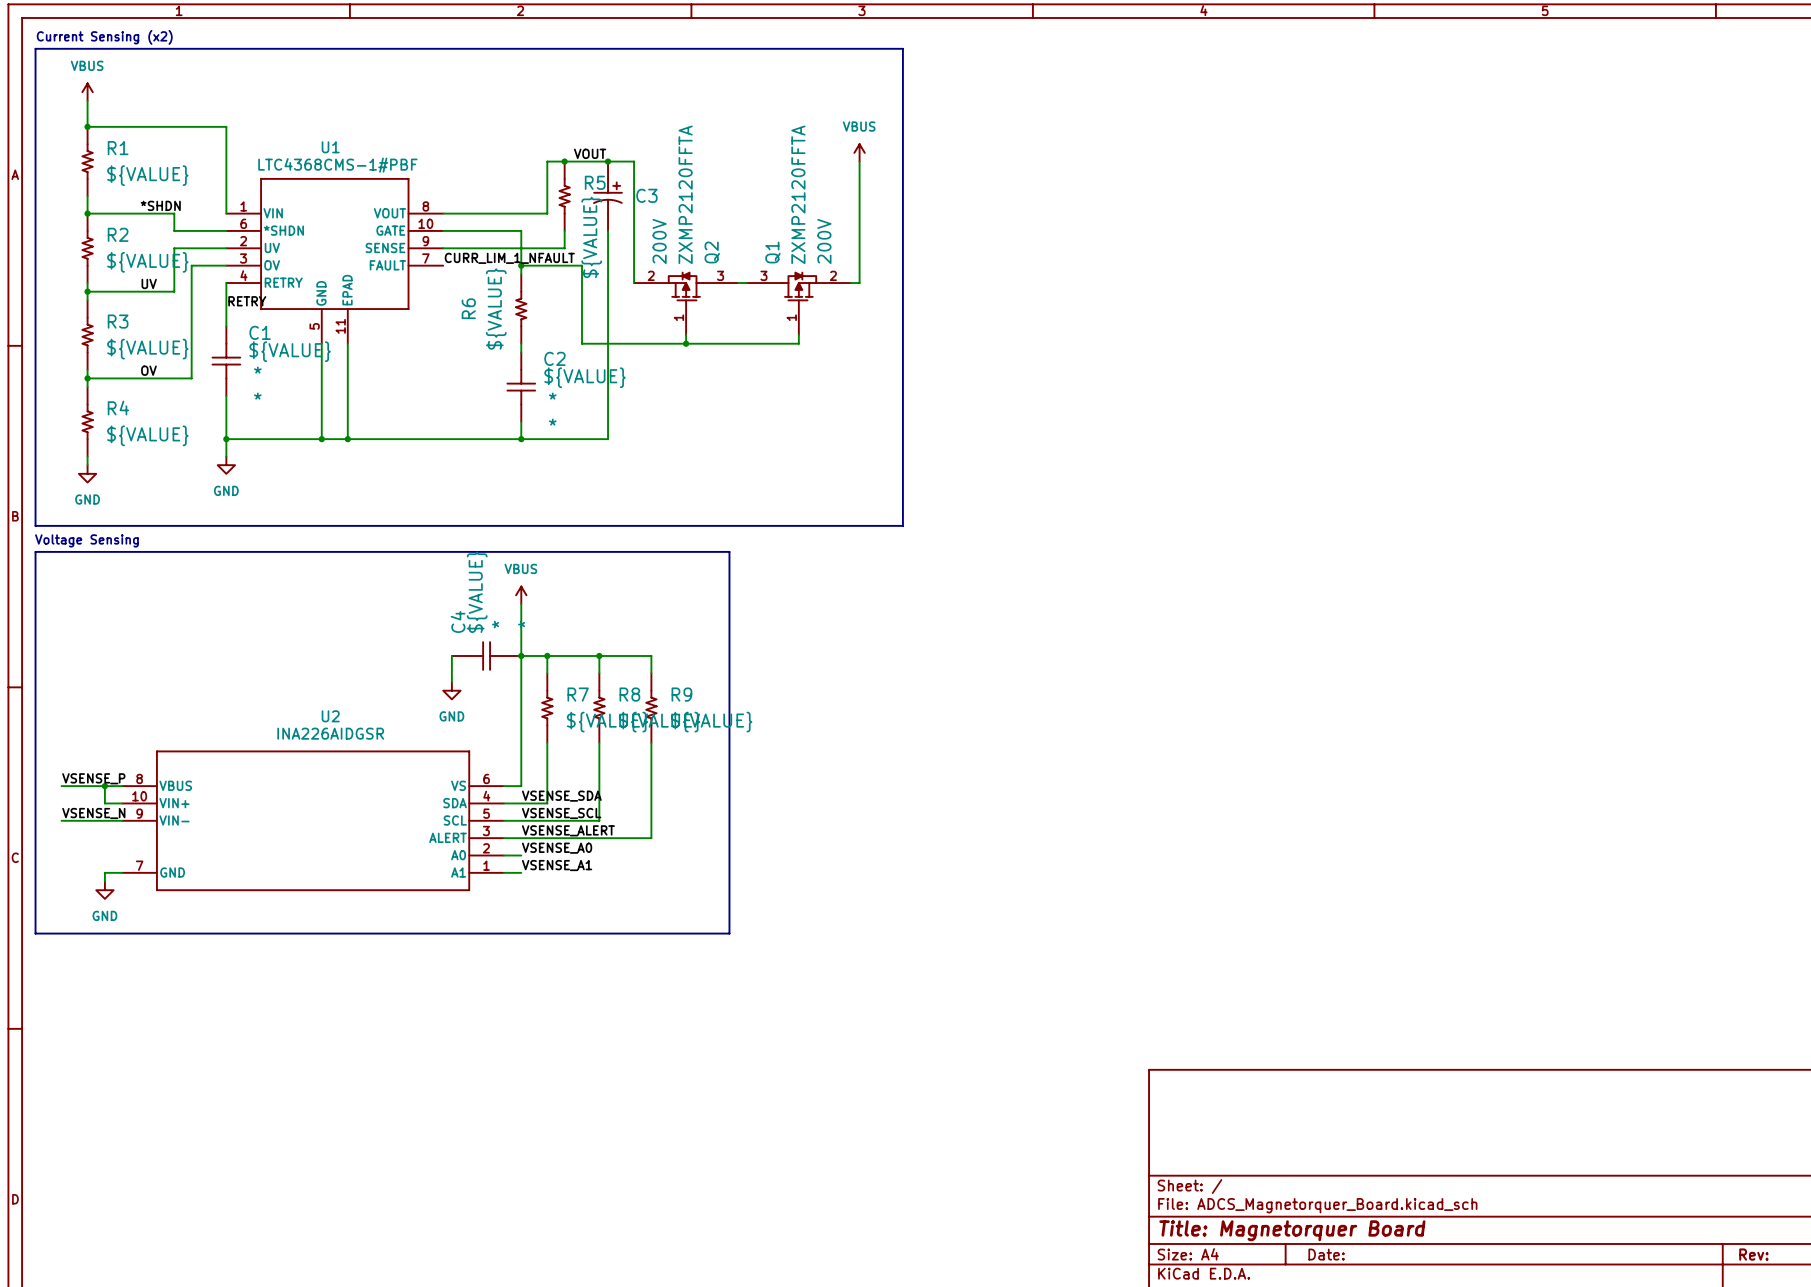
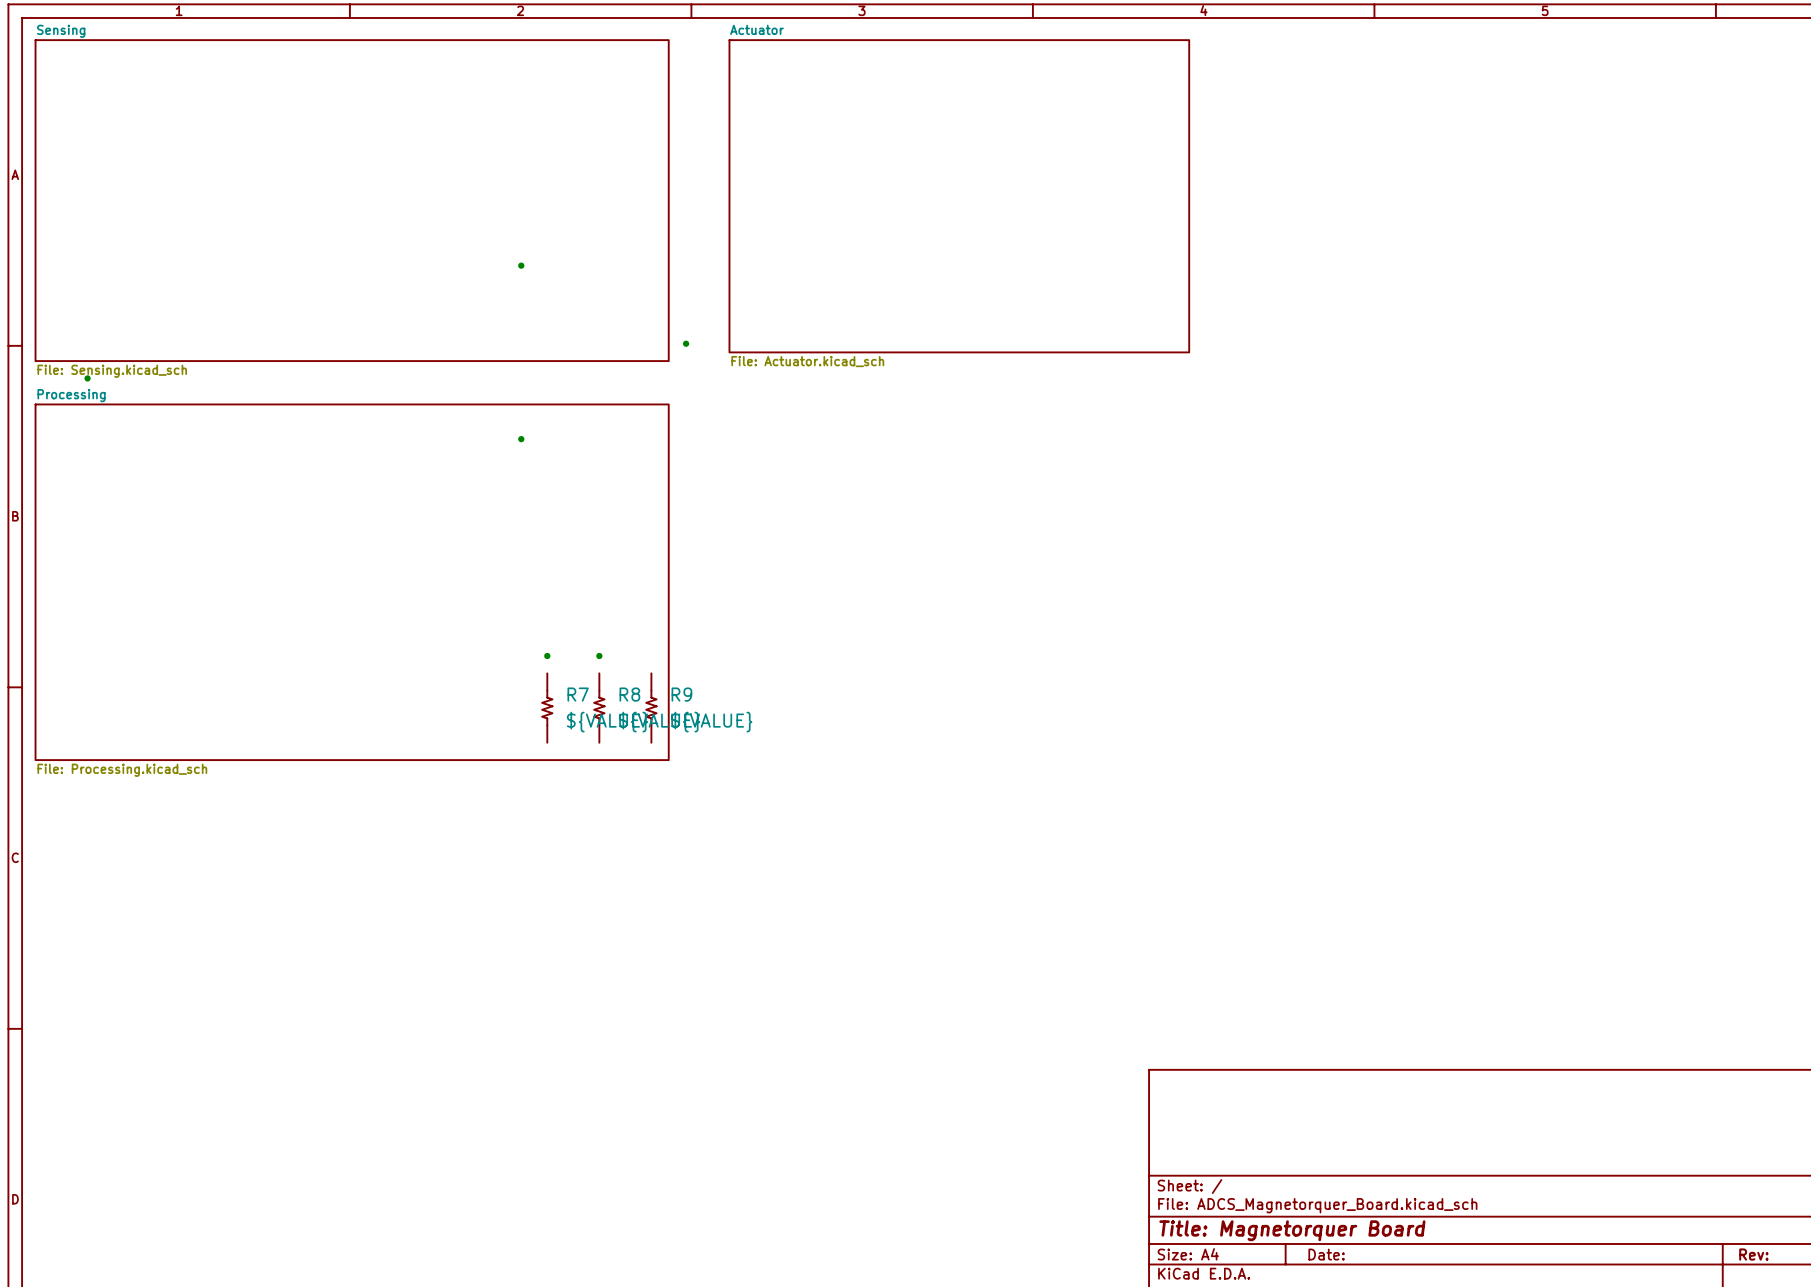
text: Current Sensing (x2) (104, 37) -> none
line: (35, 48) (902, 48) (902, 525) (35, 525) (35, 48) -> none
power symbol: VBUS (87, 92) -> none
wire: (87, 100) (87, 126) (226, 126) (226, 213) -> none
junction: (87, 126) -> none
power symbol: VBUS (859, 152) -> none
label: VOUT (590, 153) -> none
R1: ${VALUE} (87, 161) -> none
junction: (564, 161) -> none
junction: (608, 161) -> none
wire: (859, 161) (859, 283) (850, 283) -> none
wire: (87, 196) (87, 213) (174, 213) (174, 230) (226, 230) -> none
R5: ${VALUE} (564, 196) -> none
C3: (607, 196) -> none
sheet Actuator: none -> File: Actuator.kicad_sch (959, 196)
sheet Sensing: none -> File: Sensing.kicad_sch (352, 200)
label: *SHDN (160, 205) -> none
junction: (87, 213) -> none
wire: (443, 213) (547, 213) (547, 161) (634, 161) (634, 283) -> none
wire: (443, 230) (521, 230) (521, 274) -> none
wire: (564, 230) (564, 248) (443, 248) -> none
wire: (608, 230) (608, 439) (226, 439) -> none
R2: ${VALUE} (87, 248) -> none
wire: (226, 248) (174, 248) (174, 291) (87, 291) -> none
label: CURR_LIM_1_NFAULT (509, 258) -> none
U1: LTC4368CMS-1#PBF (334, 261) -> none
wire: (226, 265) (191, 265) (191, 378) (87, 378) -> none
wire: (521, 265) (582, 265) (582, 343) (798, 343) (798, 335) -> none
wire: (87, 283) (87, 300) -> none
label: UV (149, 283) -> none
wire: (226, 283) (226, 326) -> none
wire: (738, 283) (746, 283) -> none
junction: (87, 291) -> none
label: RETRY (247, 301) -> none
Q2: ZXMP2120FFTA (686, 303) -> none
Q1: ZXMP2120FFTA (798, 303) -> none
R6: ${VALUE} (521, 309) -> none
R3: ${VALUE} (87, 335) -> none
wire: (686, 335) (686, 343) -> none
wire: (321, 343) (321, 439) -> none
wire: (347, 343) (347, 439) -> none
wire: (521, 343) (521, 352) -> none
C1: ${VALUE} (226, 361) -> none
label: OV (148, 370) -> none
C2: ${VALUE} (521, 387) -> none
wire: (226, 395) (226, 456) -> none
R4: ${VALUE} (87, 421) -> none
wire: (521, 421) (521, 439) -> none
junction: (226, 439) -> none
junction: (321, 439) -> none
junction: (347, 439) -> none
wire: (87, 456) (87, 465) -> none
power symbol: GND (226, 465) -> none
power symbol: GND (87, 473) -> none
text: Voltage Sensing (86, 540) -> none
line: (35, 551) (35, 933) (729, 933) (729, 551) (35, 551) -> none
sheet Processing: none -> File: Processing.kicad_sch (352, 582)
power symbol: VBUS (521, 595) -> none
wire: (521, 603) (521, 786) (503, 786) -> none
wire: (451, 656) (451, 682) -> none
C4: ${VALUE} (486, 656) -> none
wire: (521, 656) (651, 656) (651, 673) -> none
junction: (521, 656) -> none
wire: (547, 656) (547, 673) -> none
wire: (599, 656) (599, 673) -> none
power symbol: GND (451, 690) -> none
wire: (547, 742) (547, 803) (503, 803) -> none
wire: (599, 742) (599, 820) (503, 820) -> none
wire: (651, 742) (651, 838) (503, 838) -> none
label: VSENSE_P (93, 778) -> none
wire: (61, 786) (122, 786) -> none
wire: (104, 786) (104, 803) (122, 803) -> none
junction: (104, 786) -> none
label: VSENSE_SDA (561, 796) -> none
label: VSENSE_N (93, 813) -> none
label: VSENSE_SCL (561, 813) -> none
wire: (61, 820) (122, 820) -> none
U2: INA226AIDGSR (313, 820) -> none
label: VSENSE_ALERT (568, 830) -> none
label: VSENSE_A0 (557, 848) -> none
wire: (503, 855) (521, 855) -> none
label: VSENSE_A1 (557, 865) -> none
wire: (122, 872) (104, 872) (104, 881) -> none
wire: (503, 872) (521, 872) -> none
power symbol: GND (104, 890) -> none

